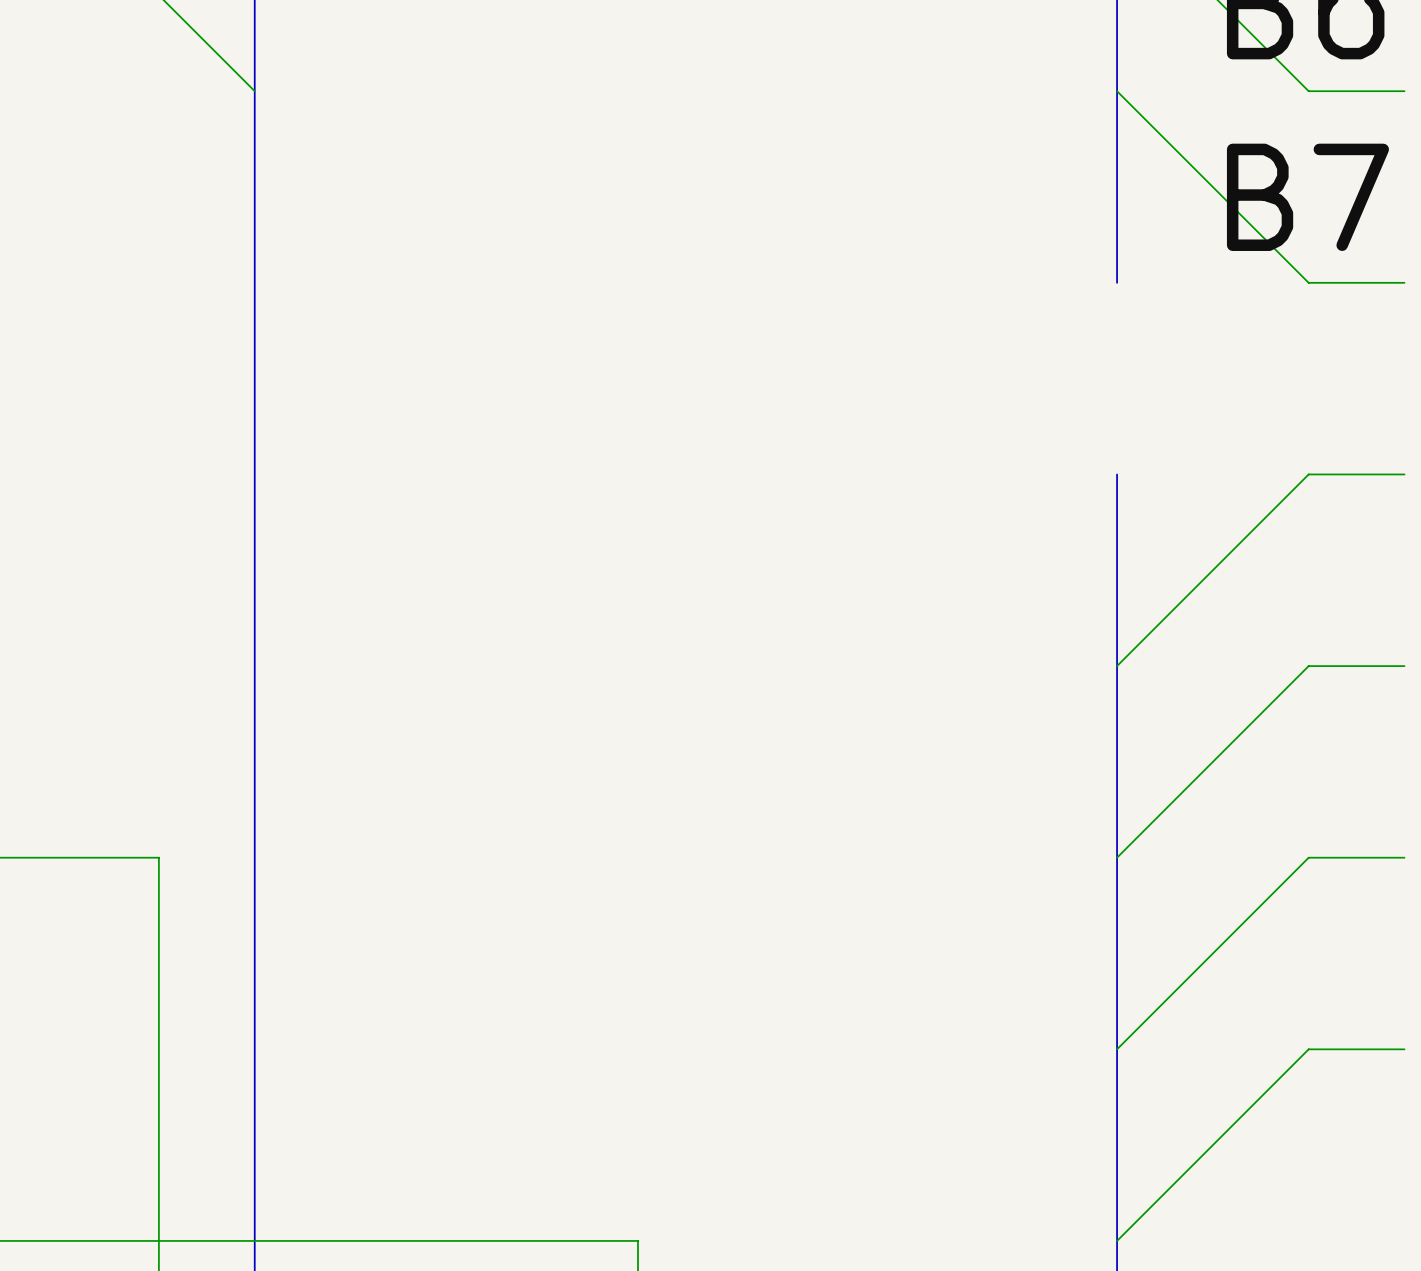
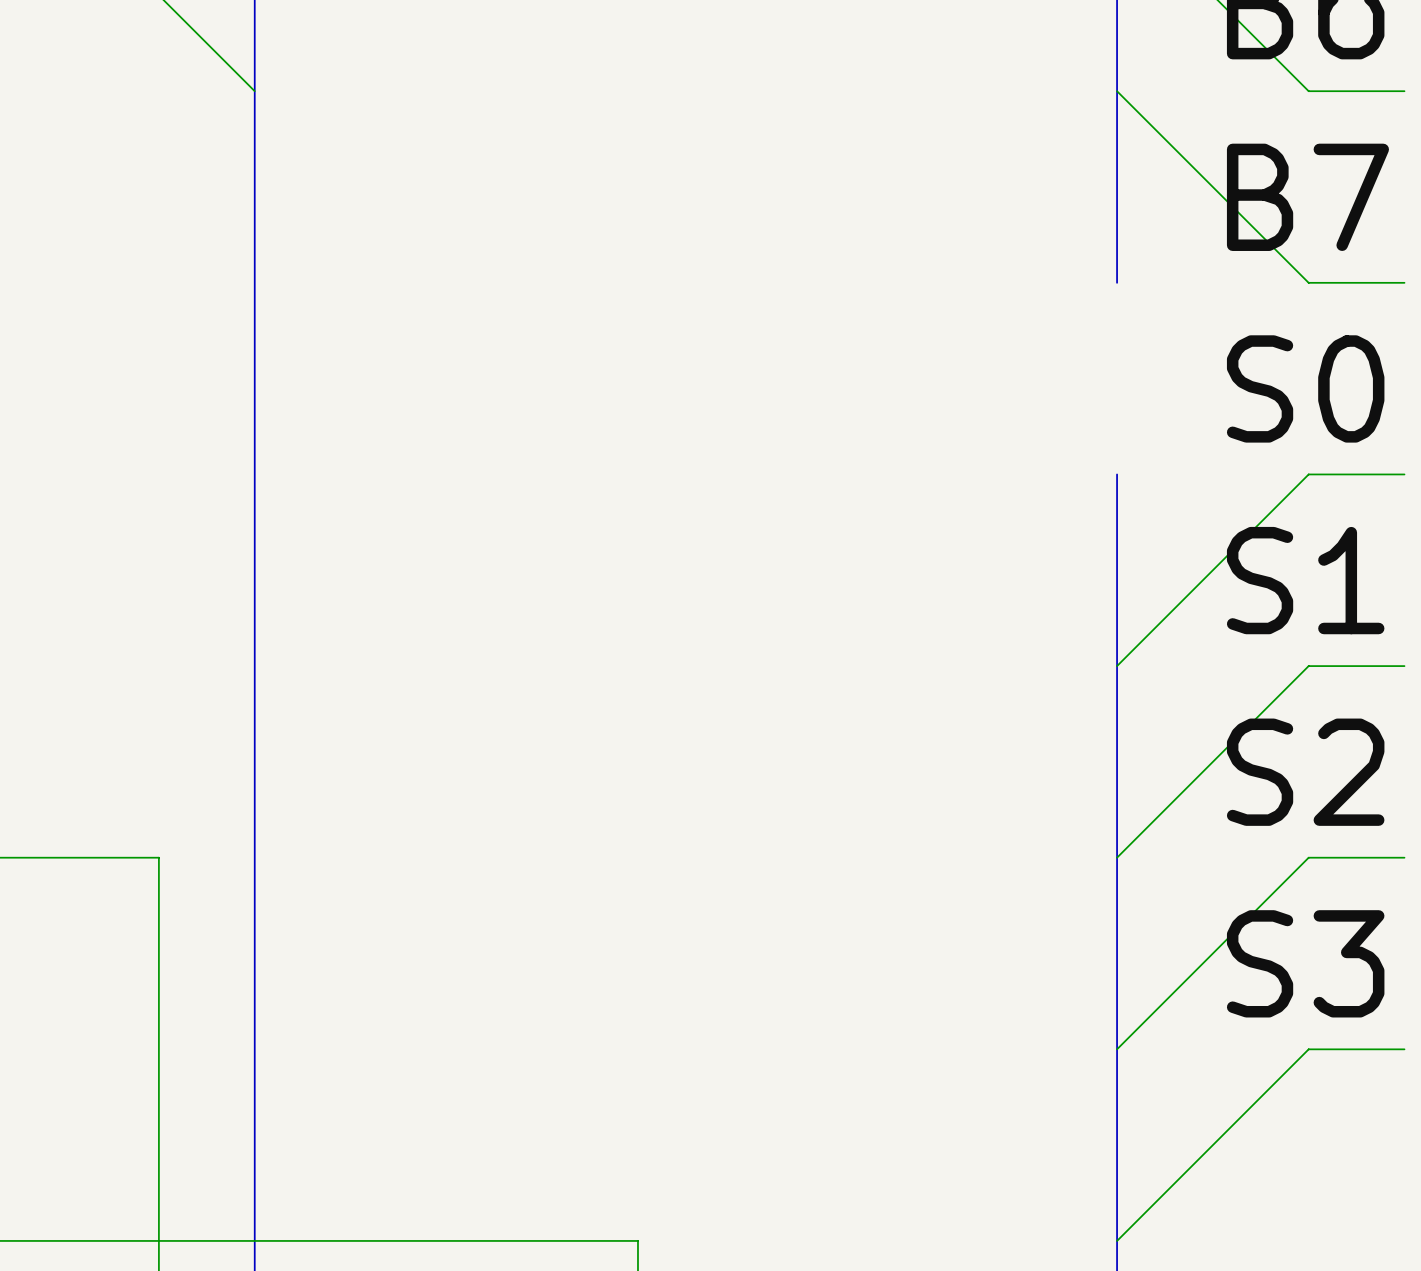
label: none -> S0 (1305, 388)
label: none -> S1 (1305, 580)
label: none -> S2 (1305, 772)
label: none -> S3 (1305, 963)

